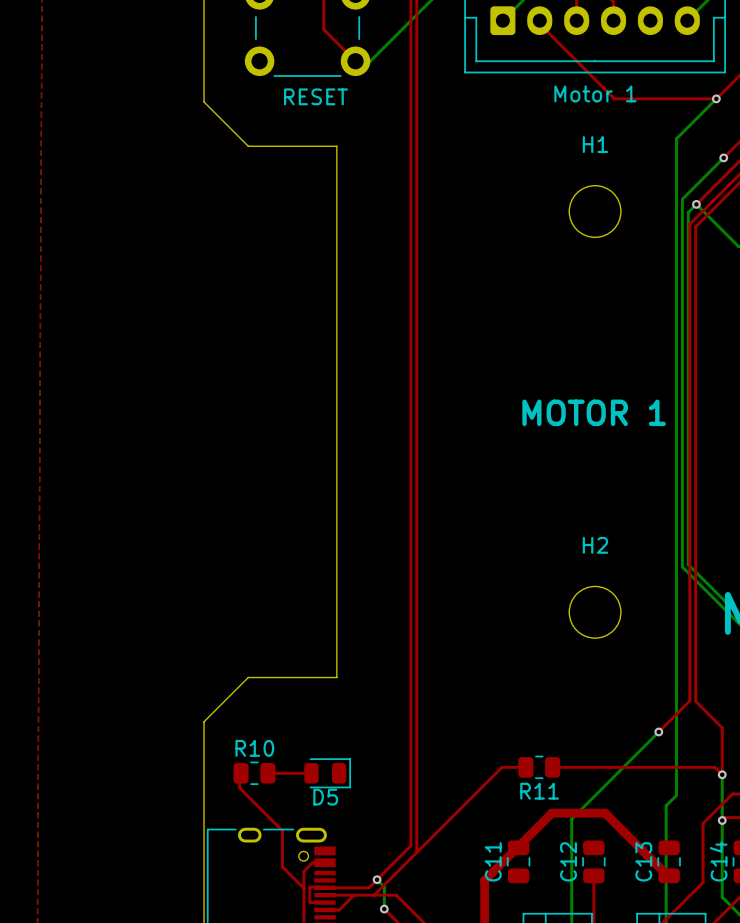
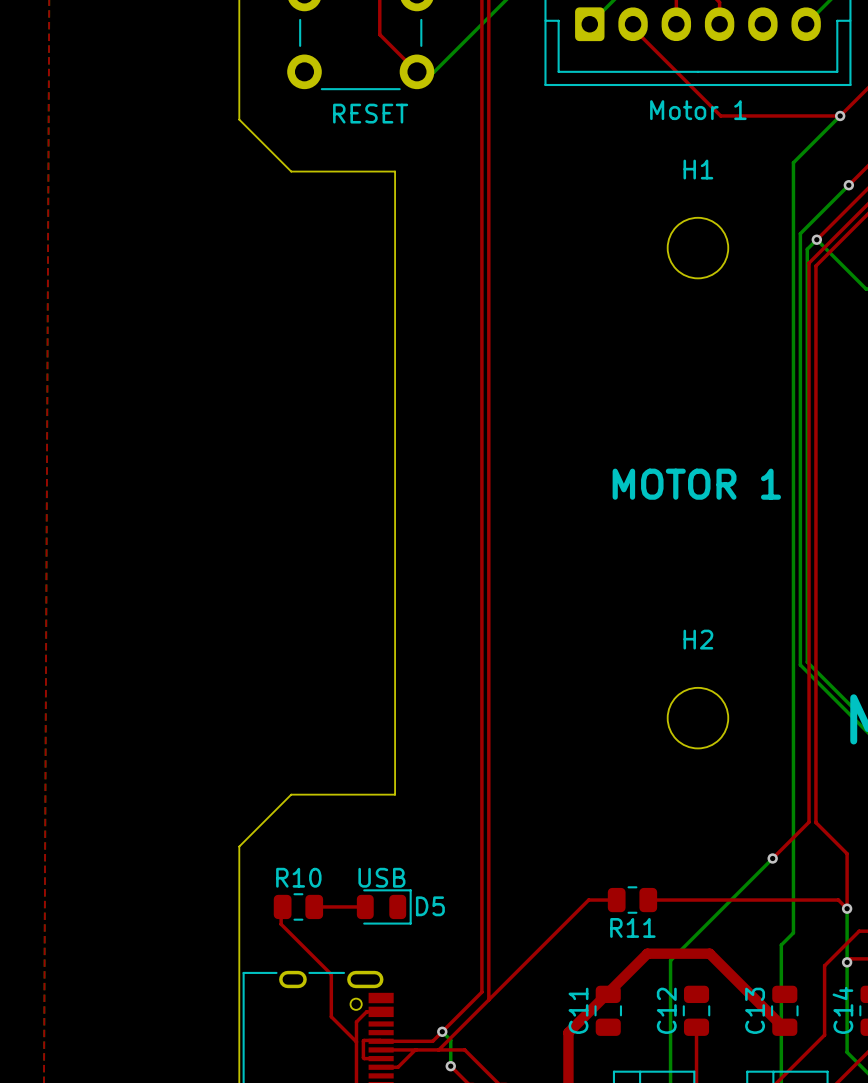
D5 value: none -> USB (381, 877)
D5 name position: D5 (325, 797) -> D5 (430, 906)

